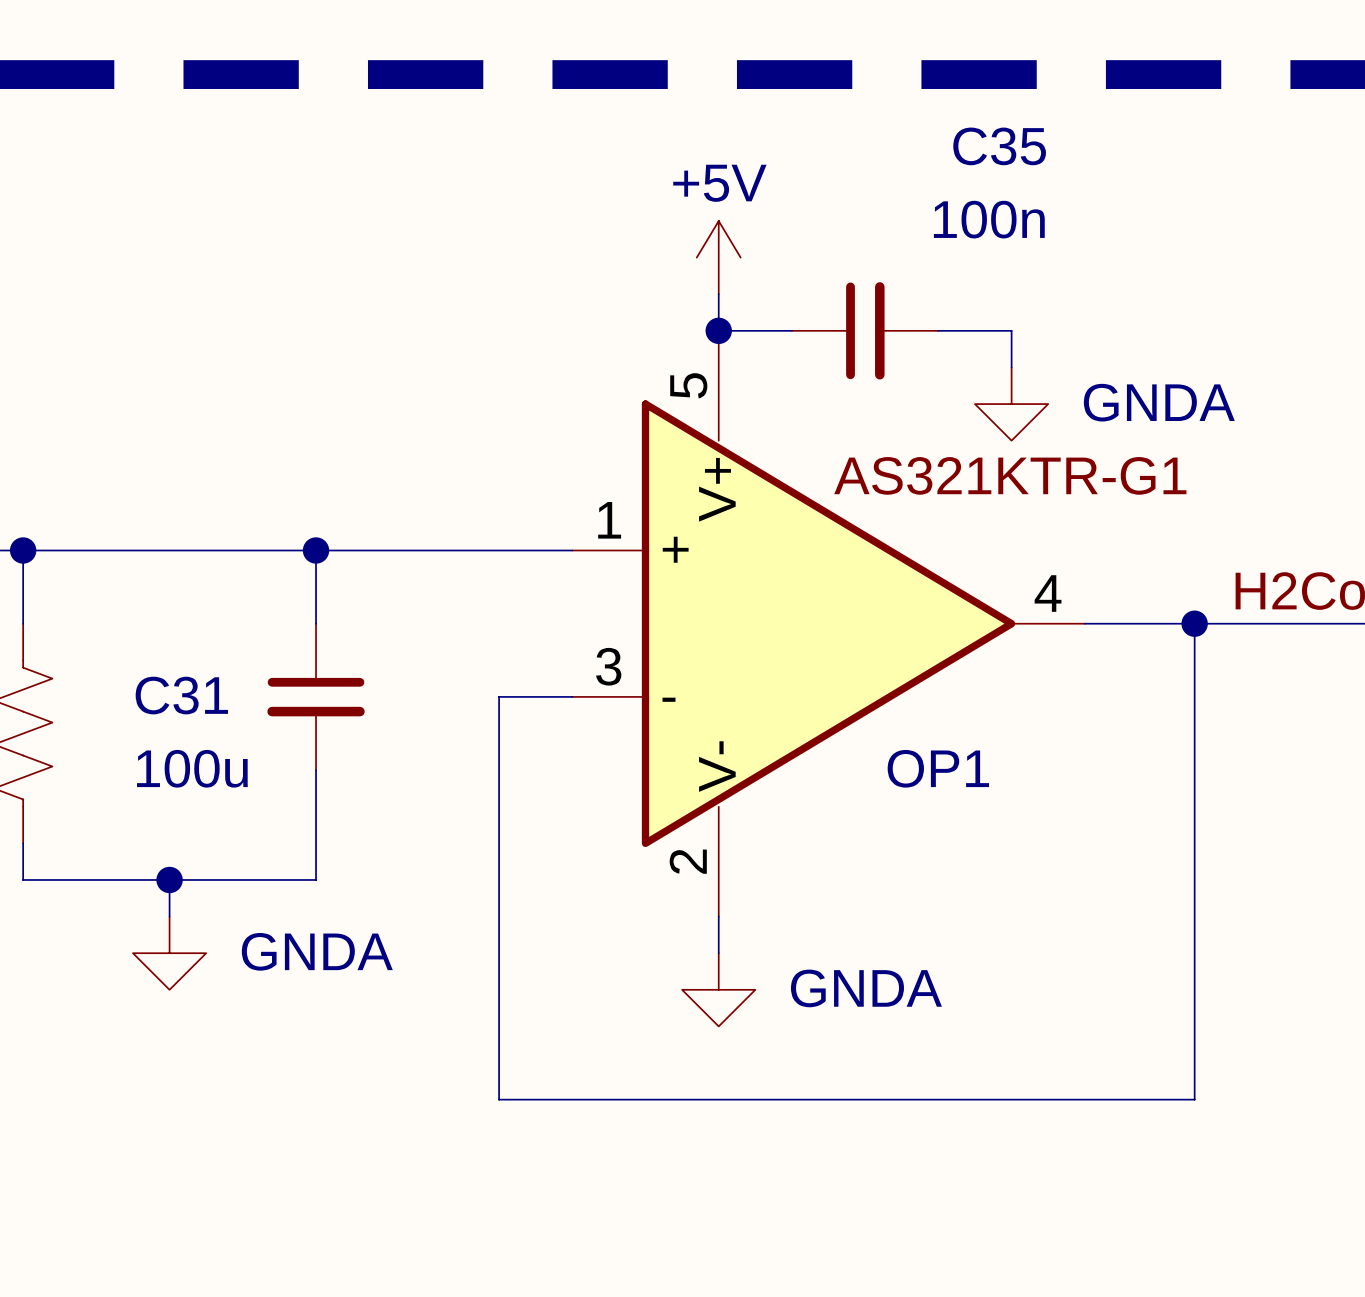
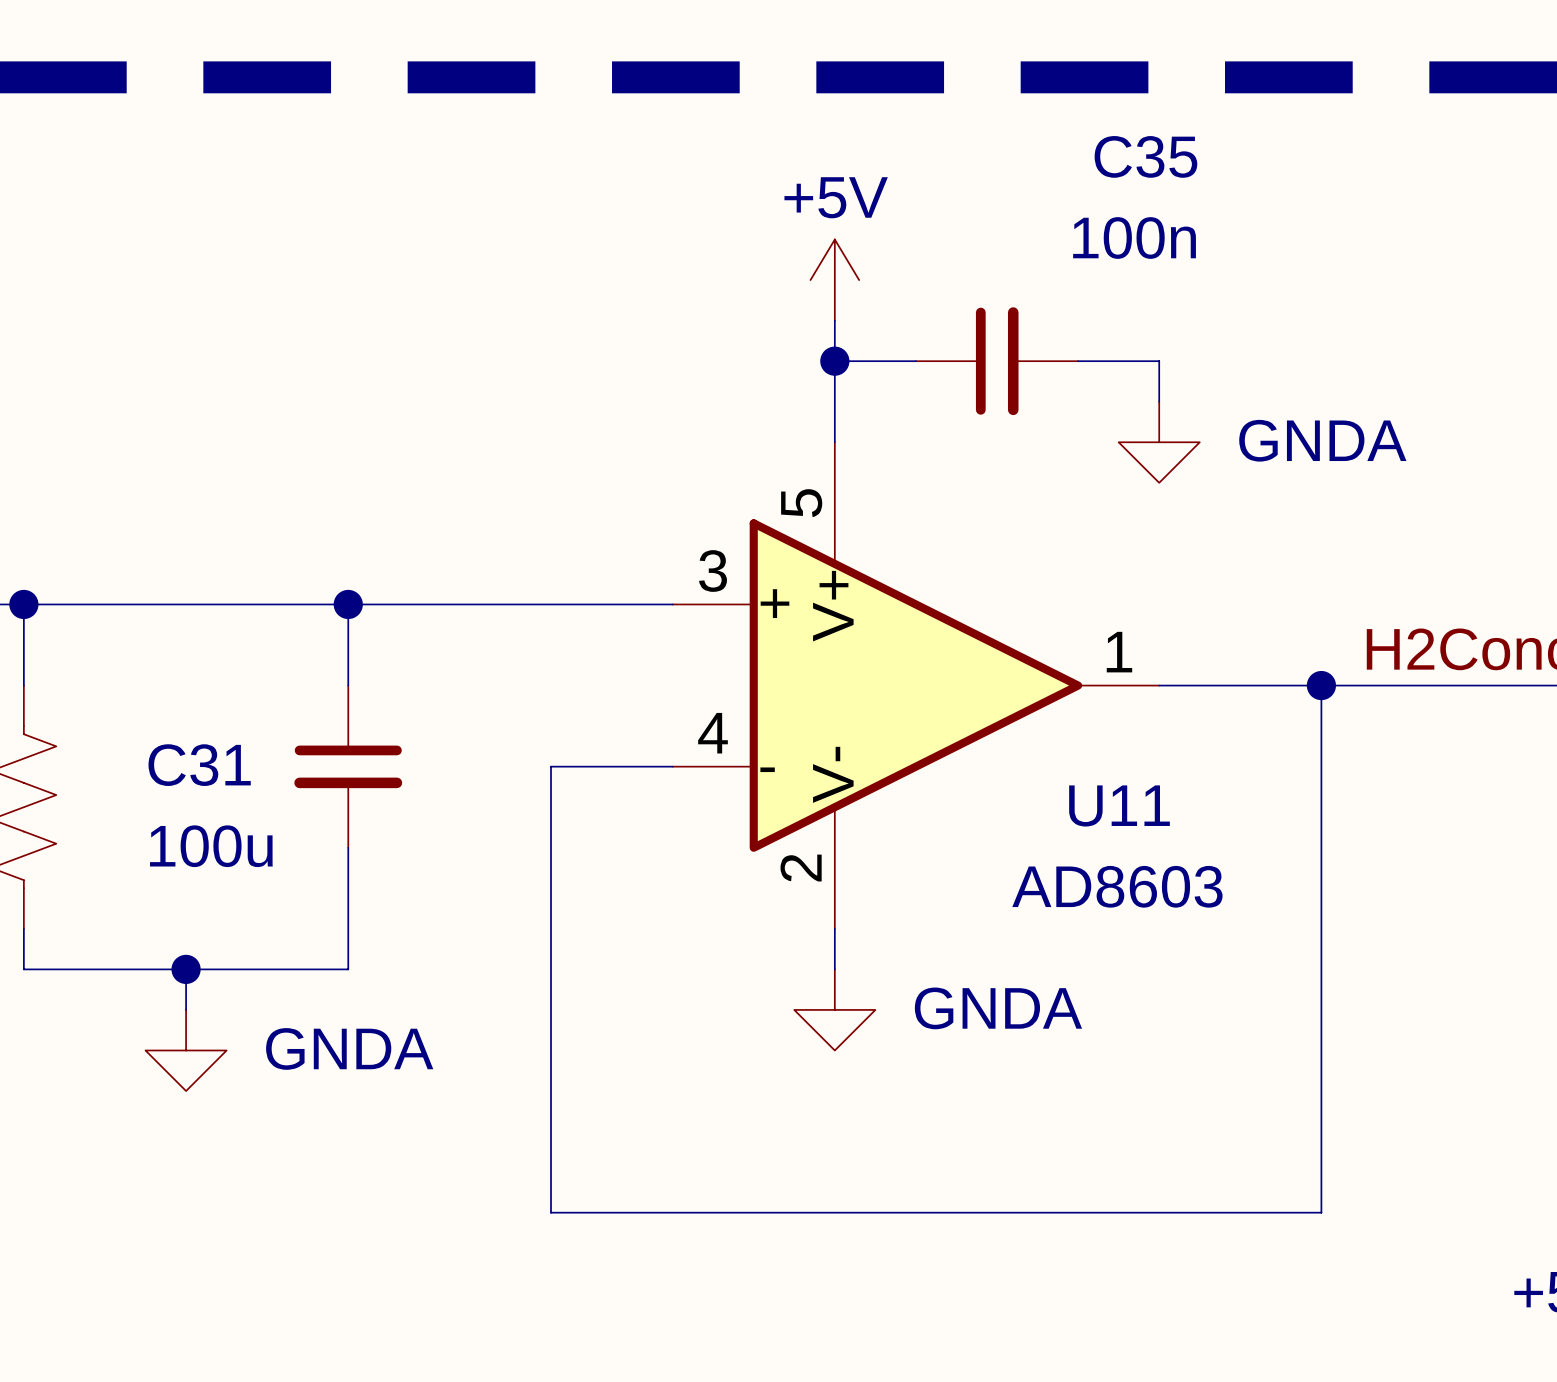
power symbol position: +5V (718, 257) -> +5V (834, 280)
wire: (718, 294) (718, 330) (755, 330) -> none
wire: none -> (834, 320) (834, 442)
junction position: (718, 330) -> (834, 361)
C35 position: (865, 330) -> (997, 361)
wire: (1011, 330) (1011, 367) -> (1118, 361) (1159, 361) (1159, 401)
power symbol position: GNDA (1011, 404) -> GNDA (1159, 442)
OP1: (828, 623) -> none
U11: none -> AD8603 (915, 685)
wire: (718, 916) (718, 953) -> (834, 928) (834, 969)
power symbol position: GNDA (718, 989) -> GNDA (834, 1009)

